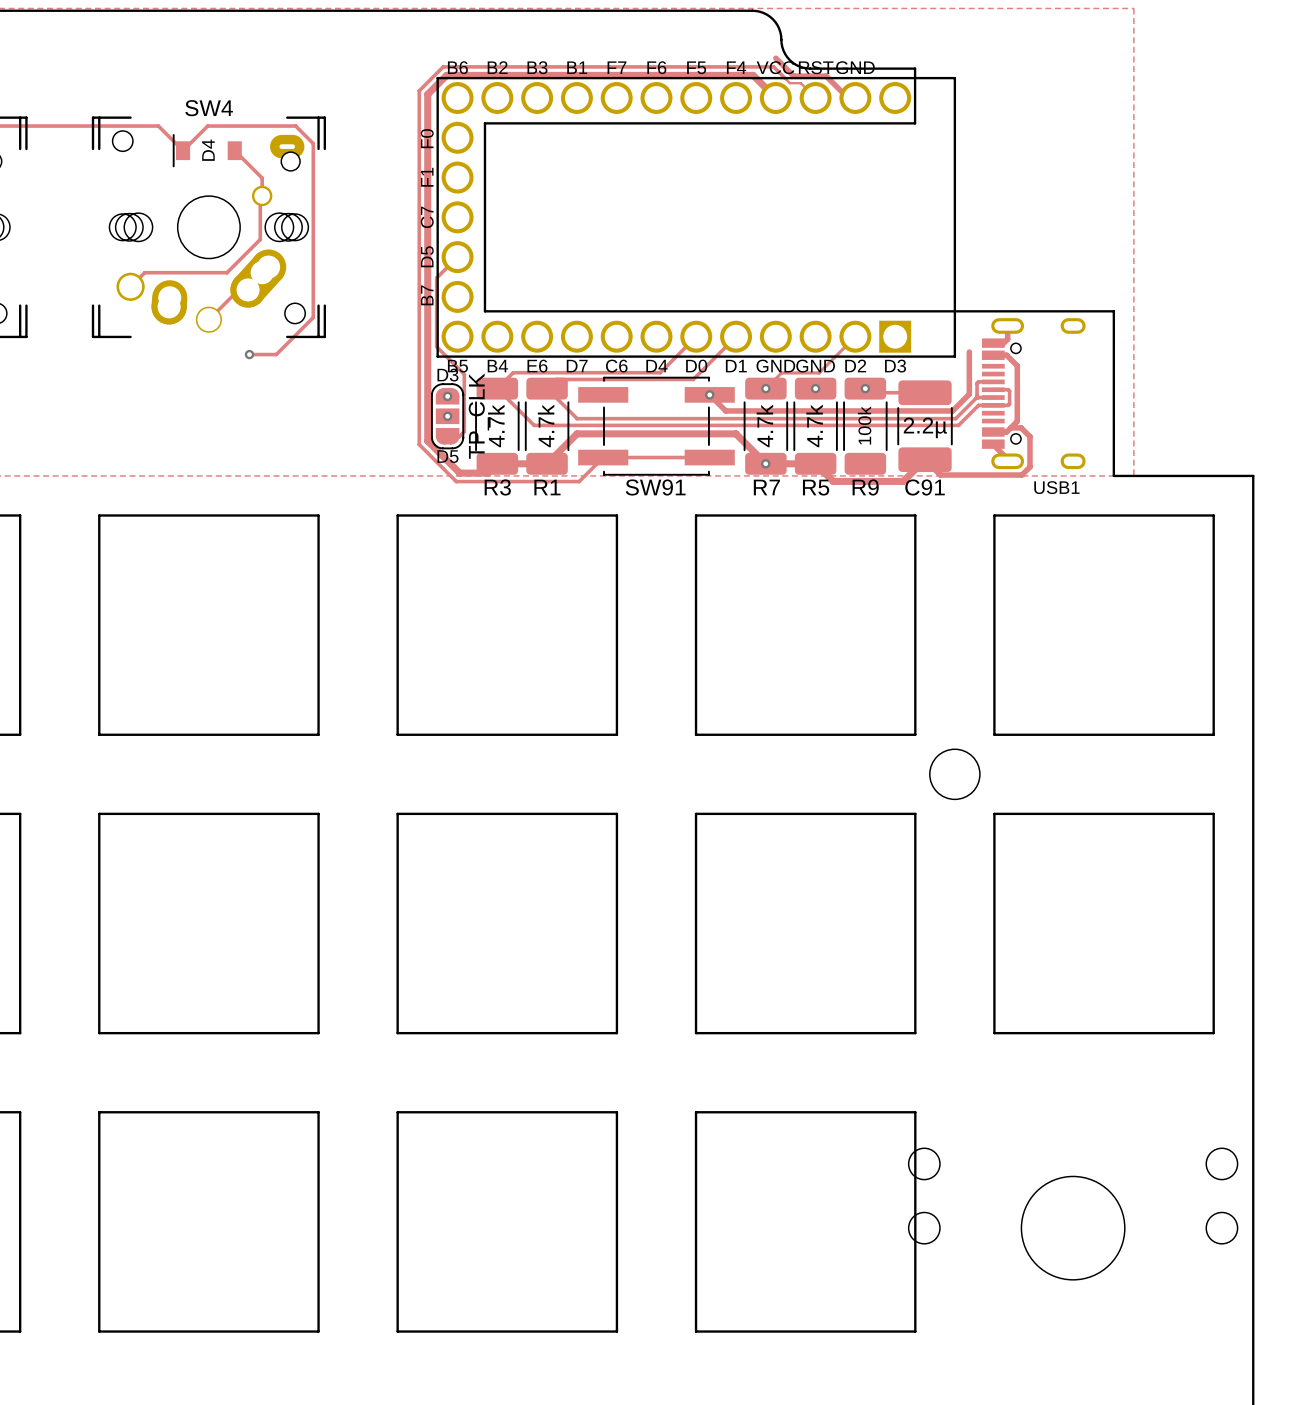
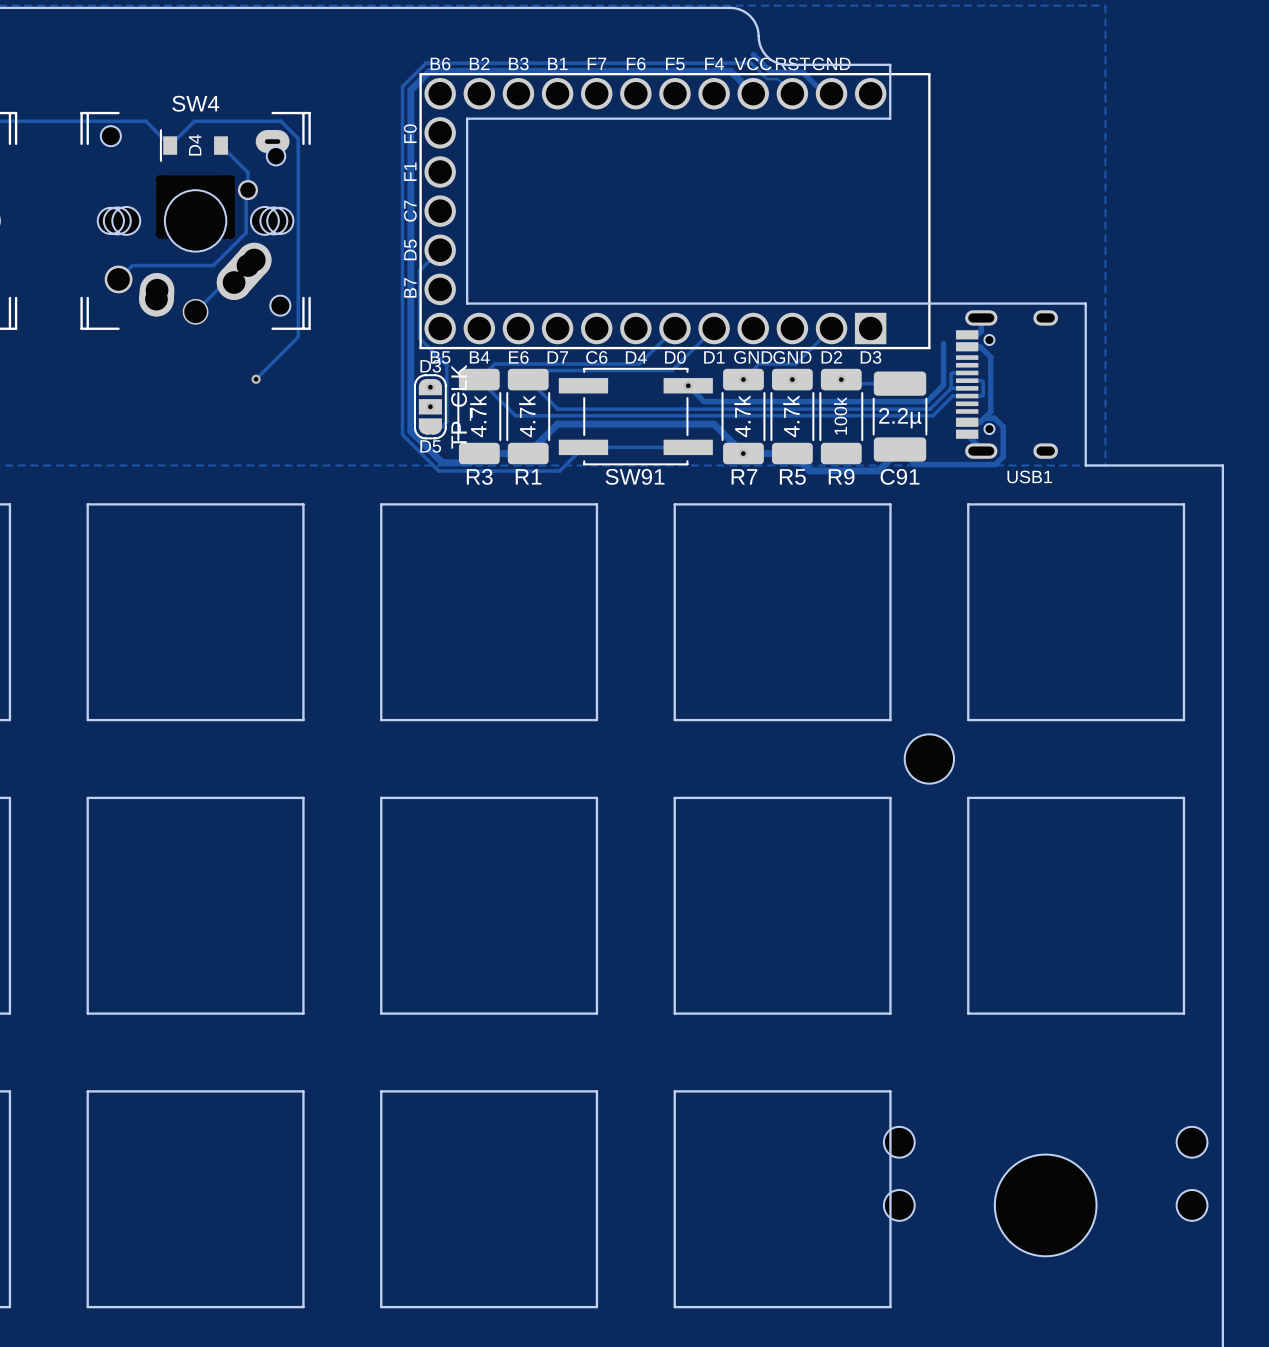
track: (313, 317) (276, 354) (249, 354) -> (298, 309) (298, 337) (256, 379)
via position: (249, 354) -> (256, 379)

